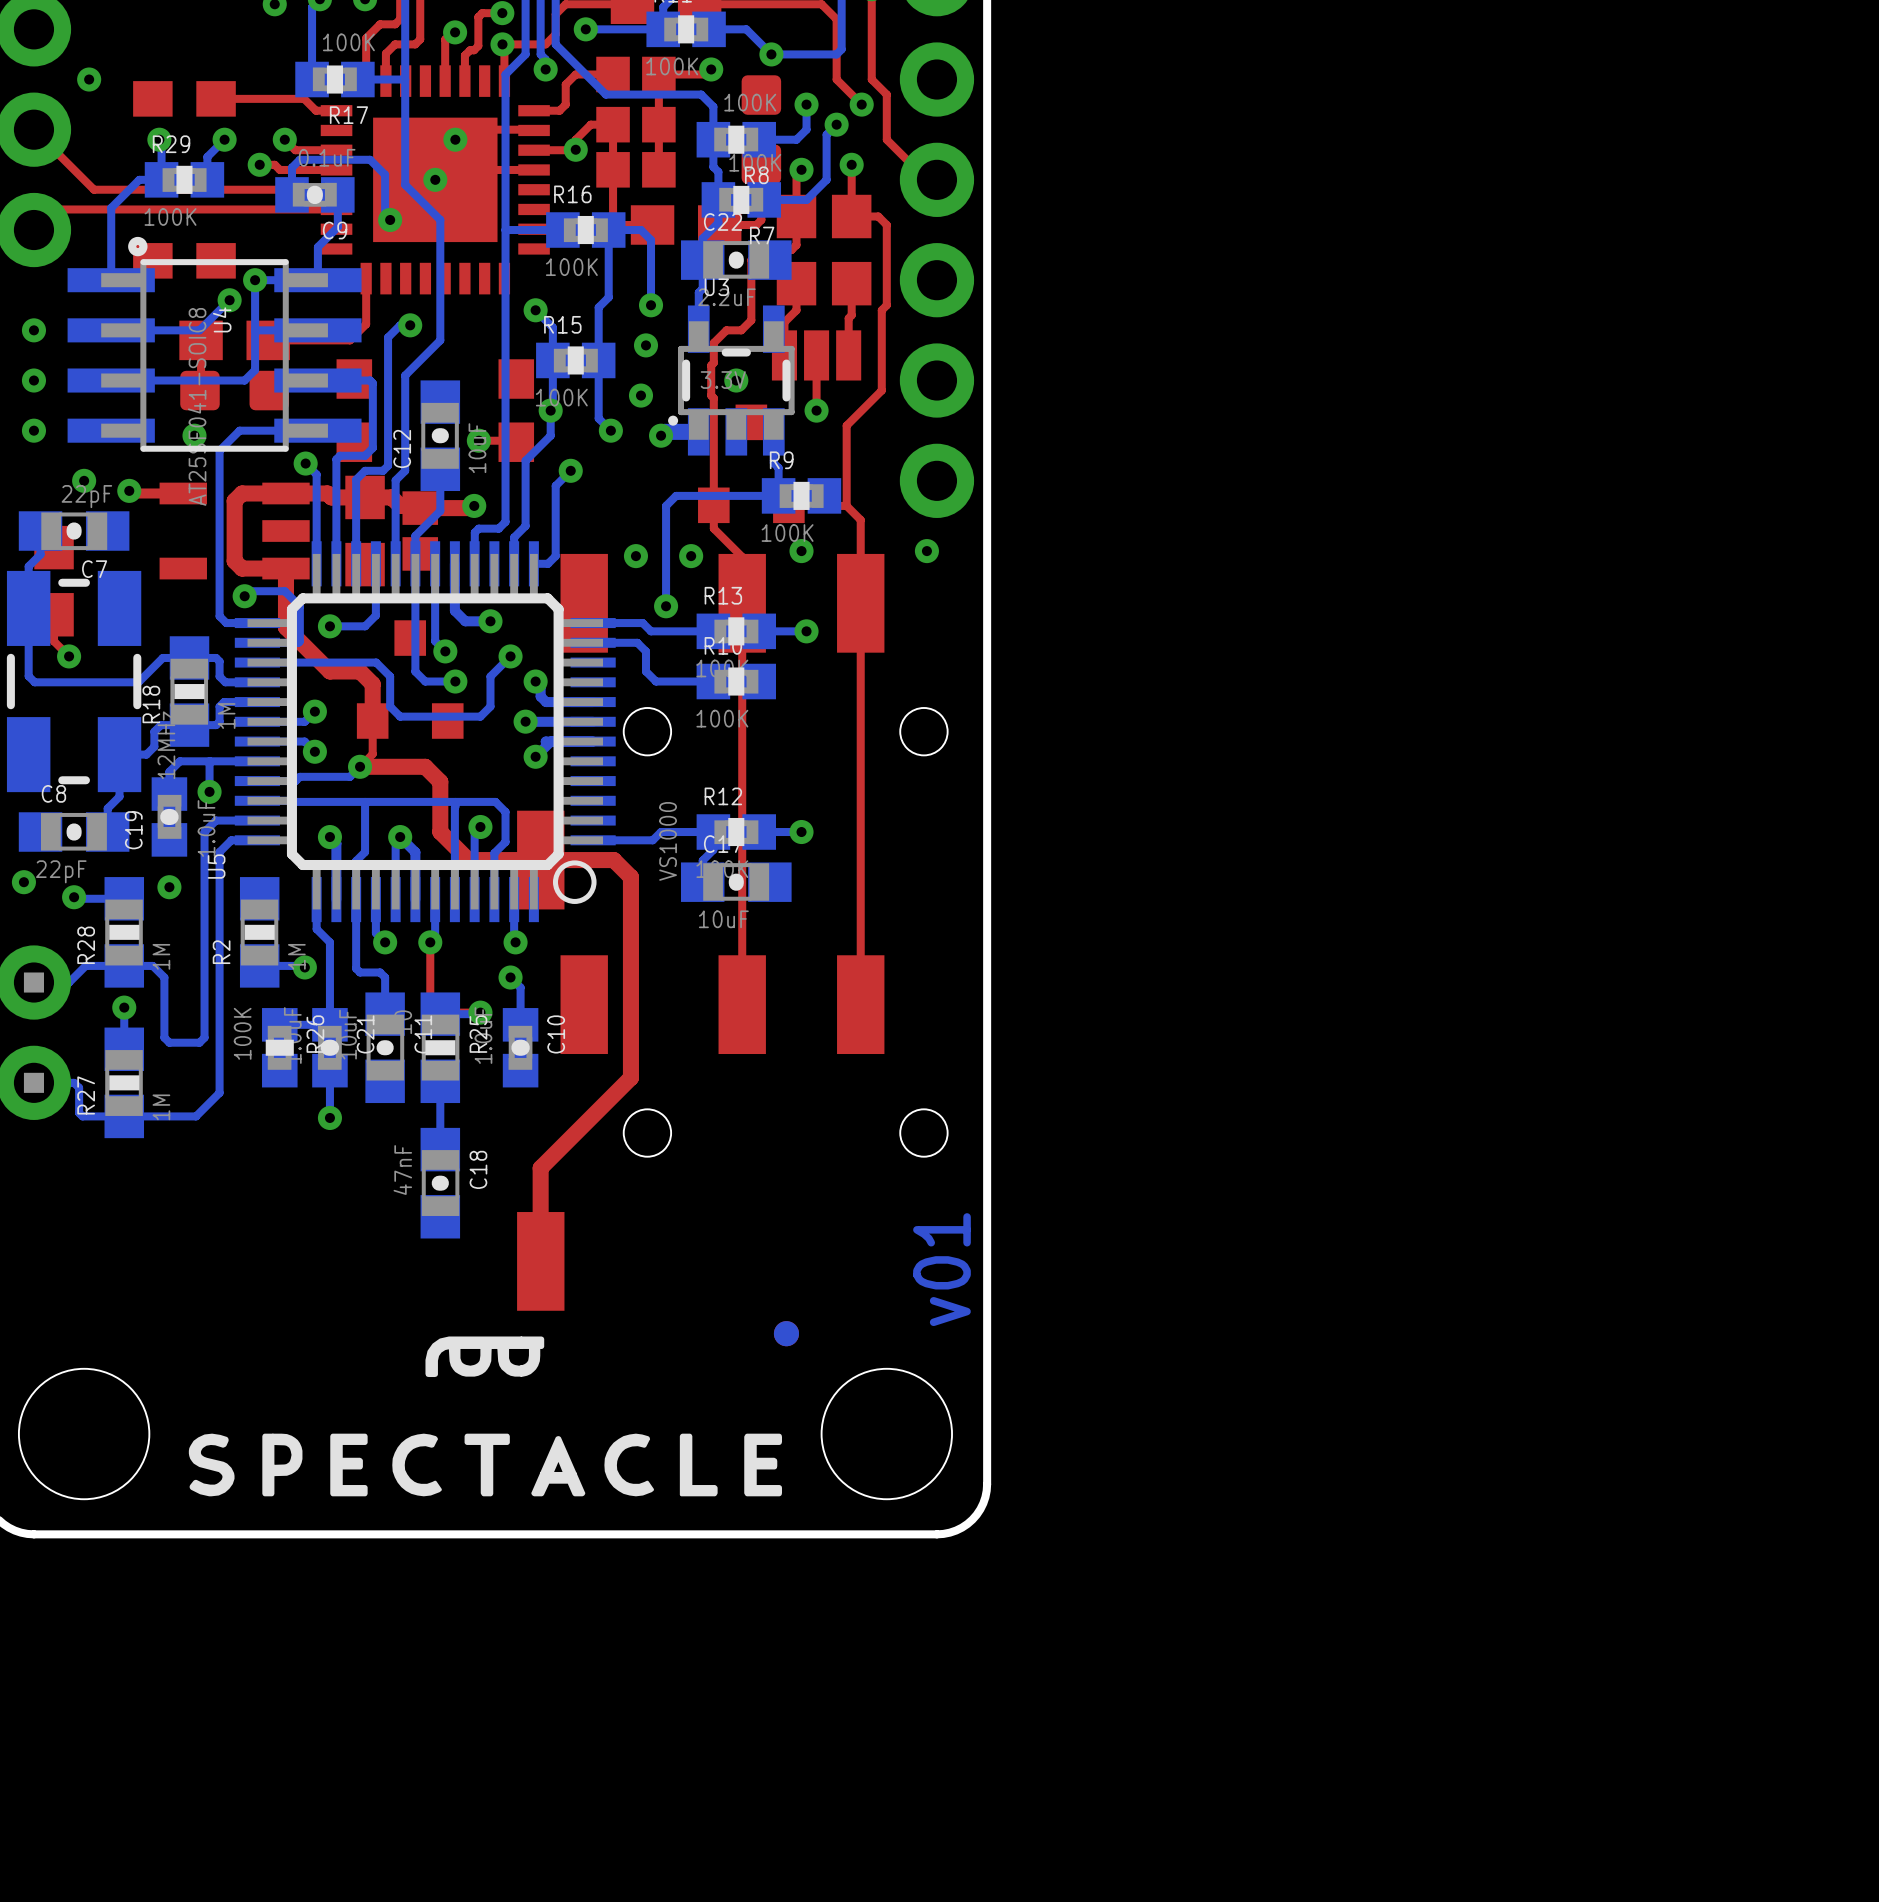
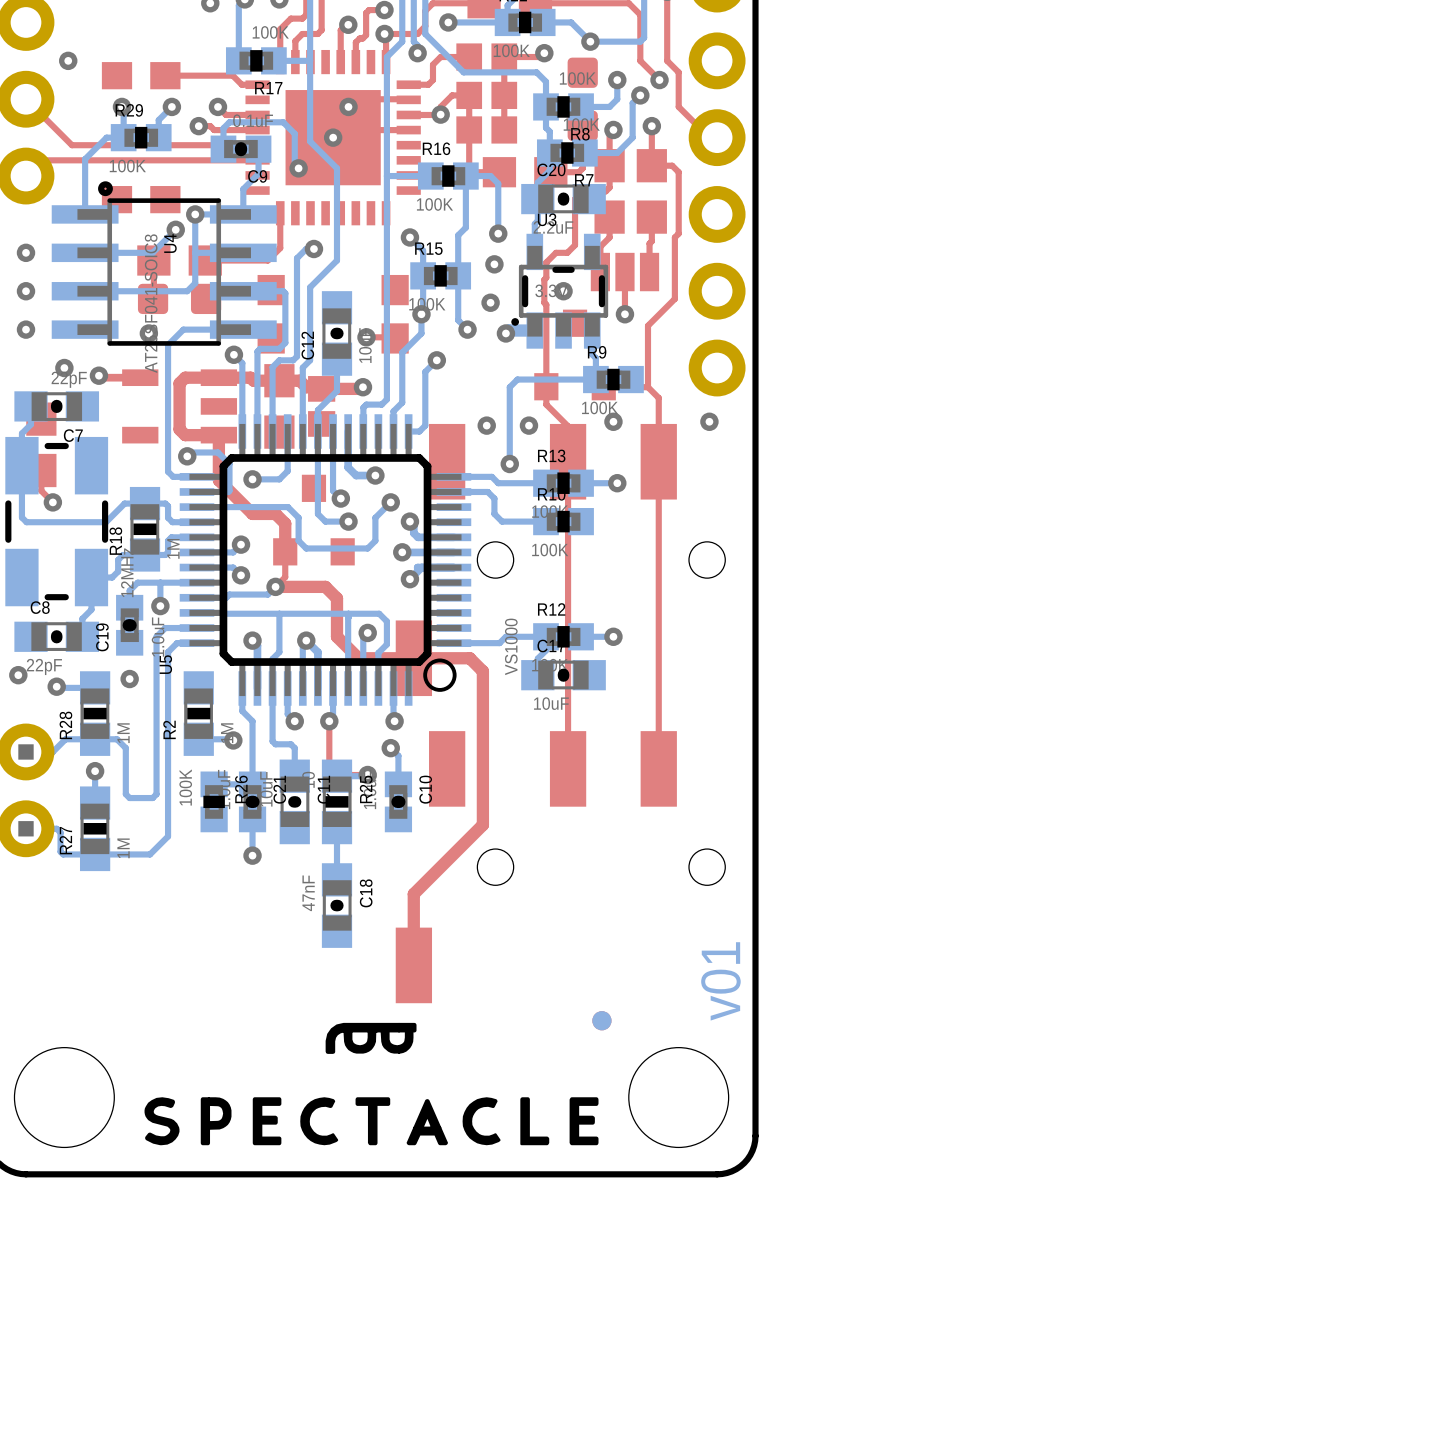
C22 name: C22 (723, 221) -> C20 (551, 169)

